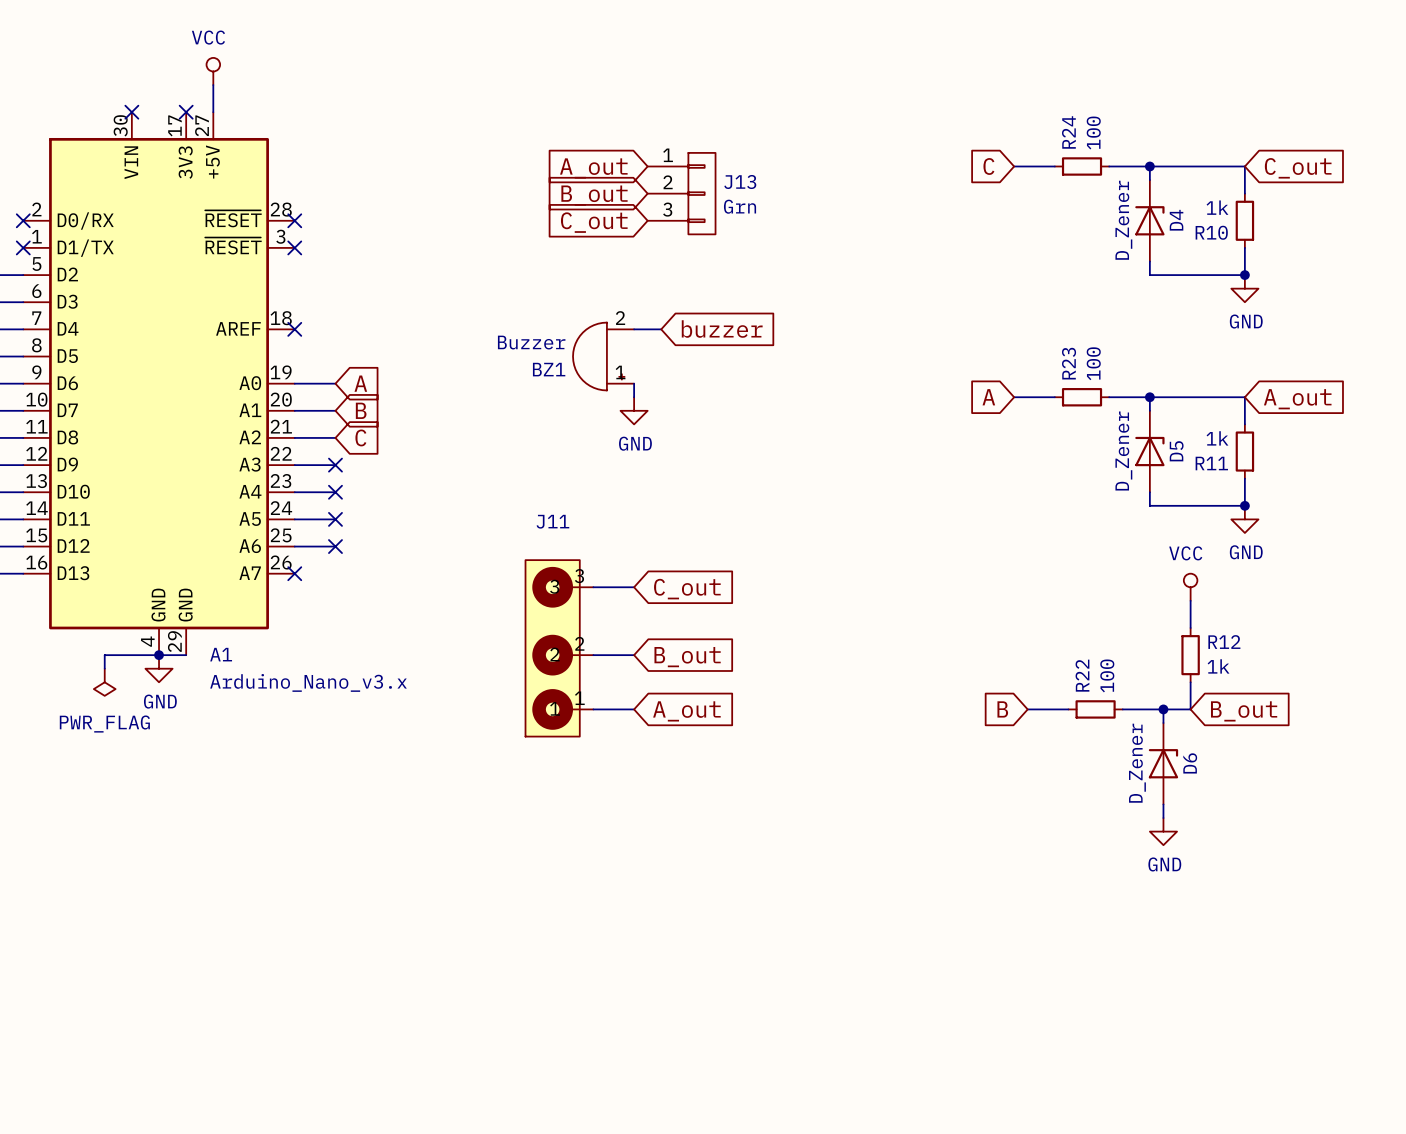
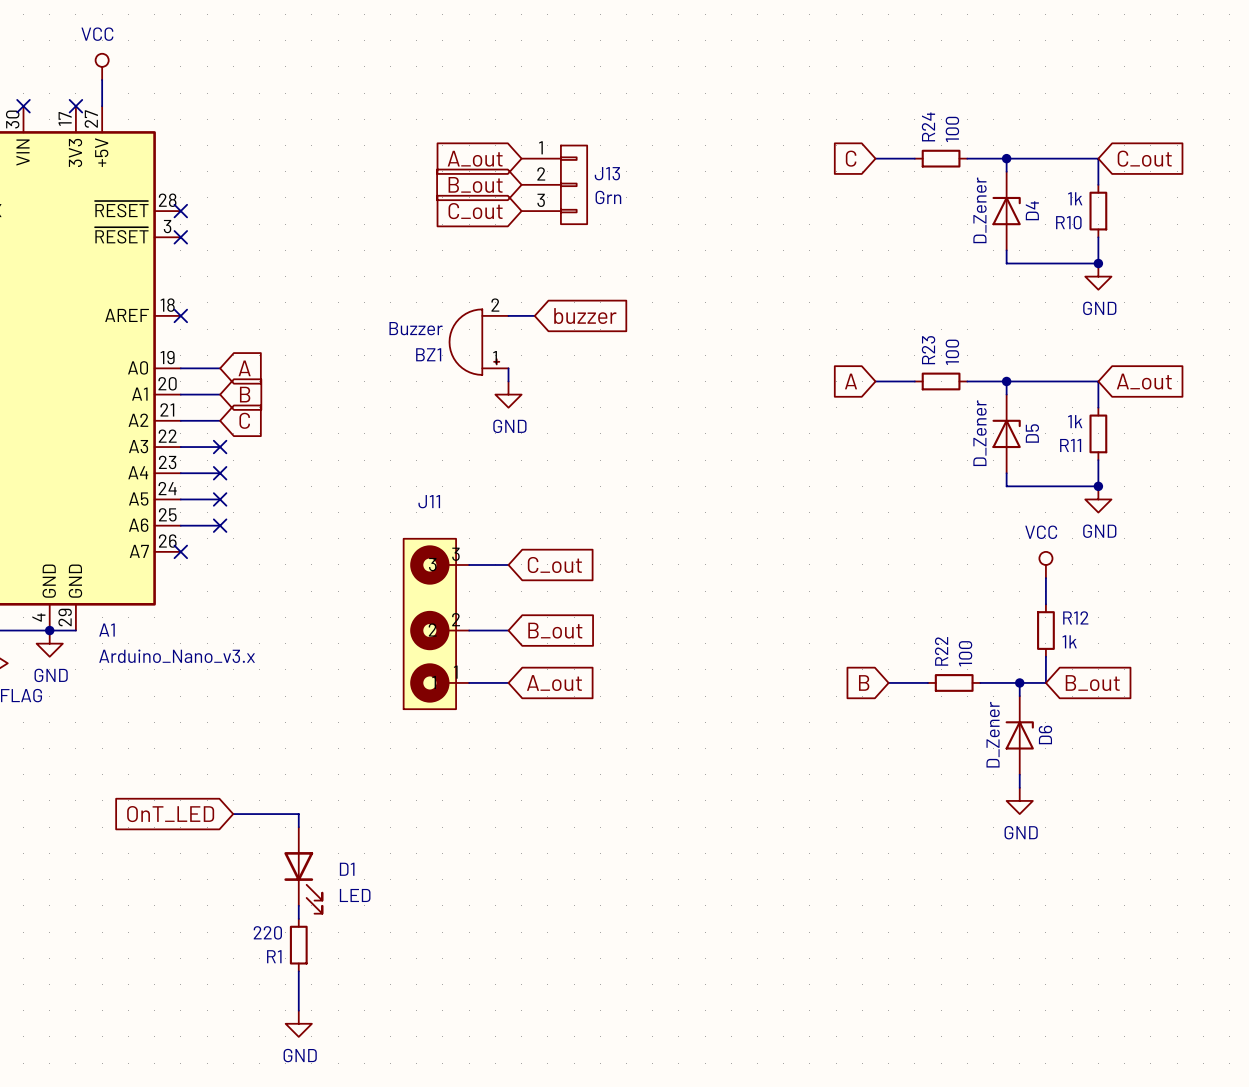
wire: none -> (233, 814) (298, 814) (298, 827)
global label: none -> OnT_LED (170, 814)
D1: none -> LED (303, 870)
wire: none -> (298, 905) (298, 918)
R1: none -> 220 (298, 945)
wire: none -> (298, 971) (298, 1010)
power symbol: none -> GND (298, 1023)

